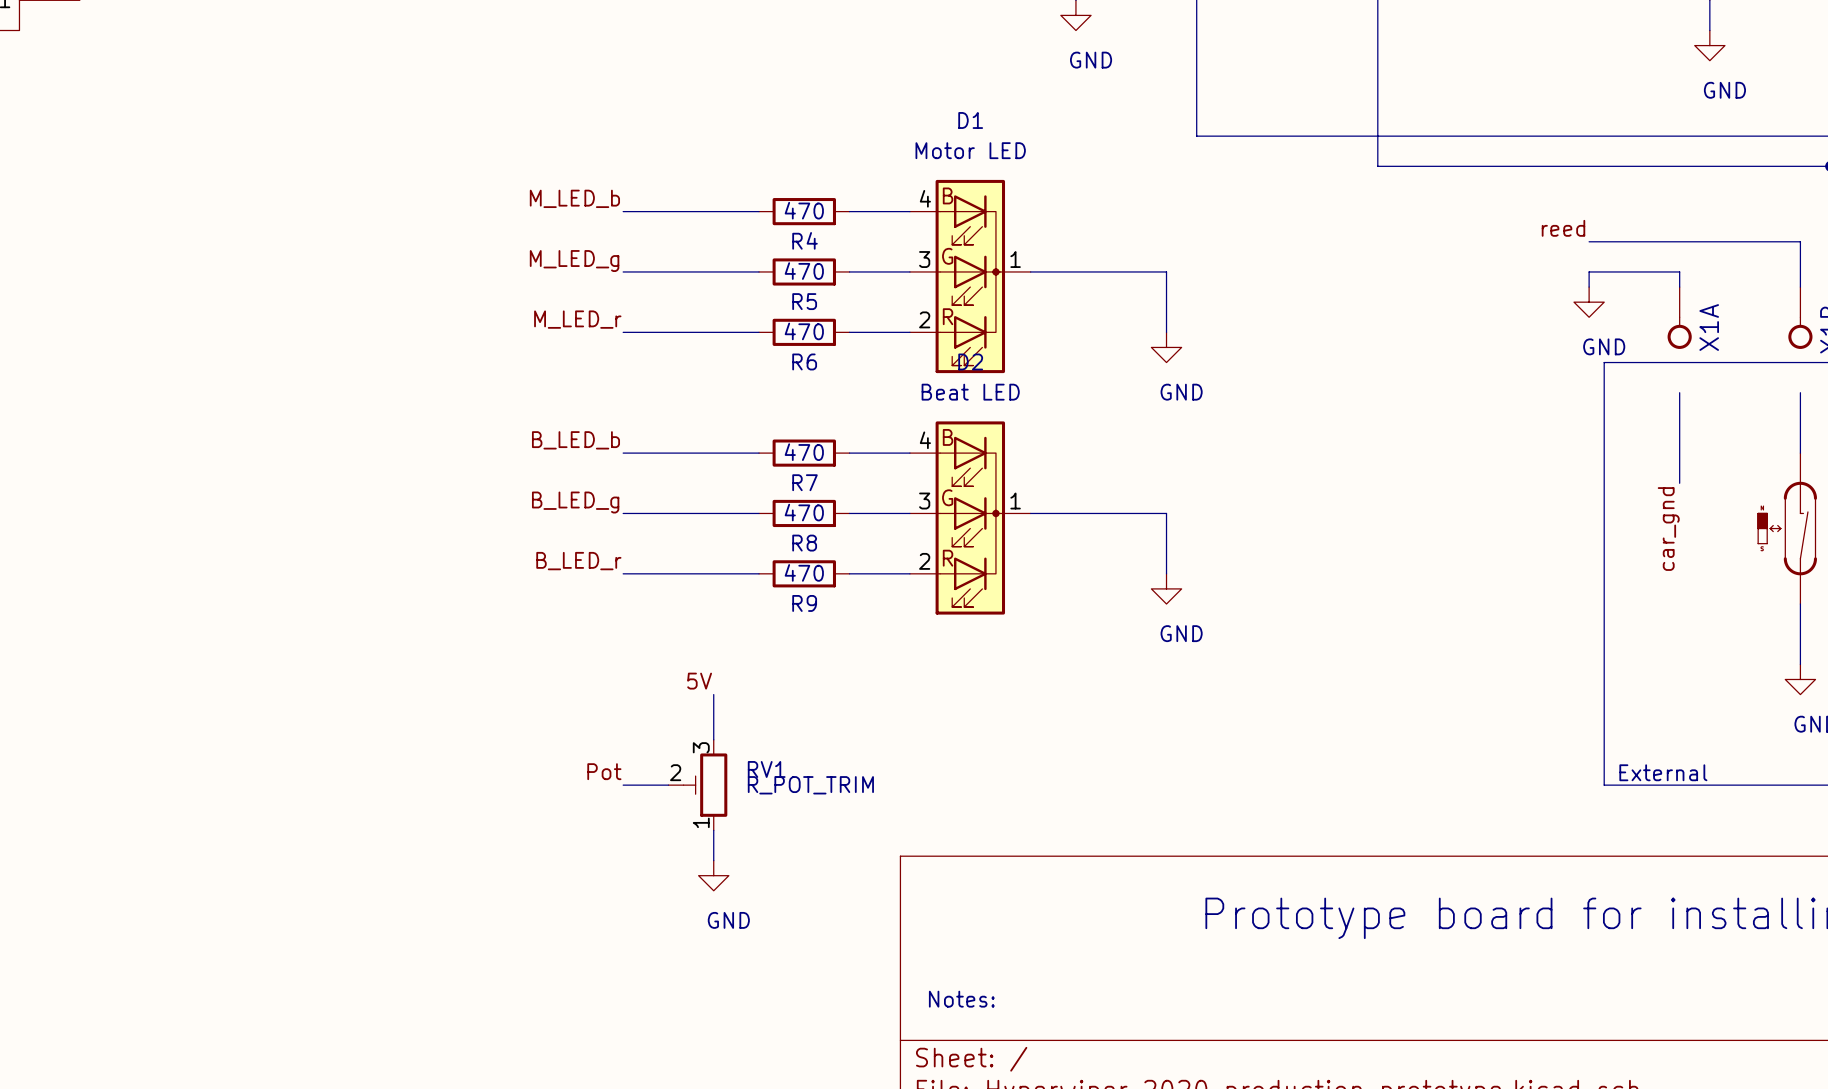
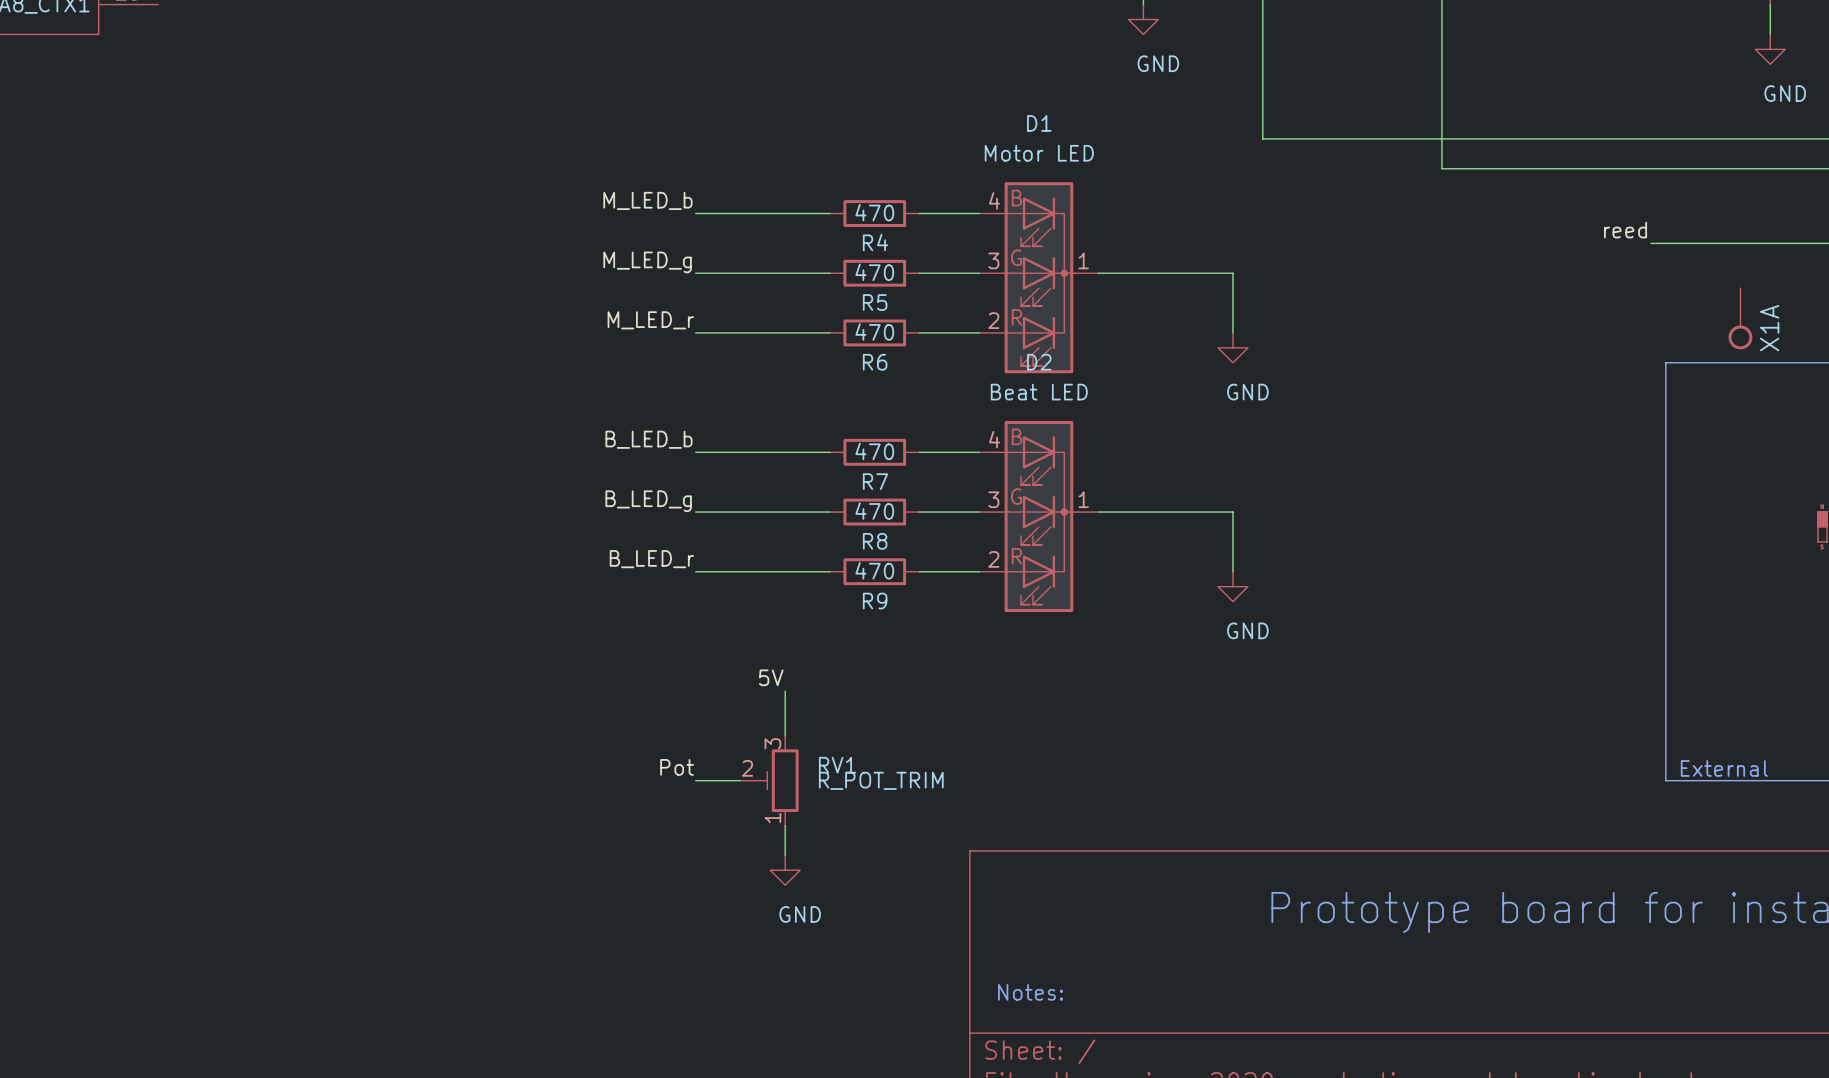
wire: (1589, 287) (1589, 271) (1679, 271) (1679, 287) -> none
power symbol: GND (1589, 302) -> none
wire: (1679, 392) (1679, 483) -> none
label: car_gnd (1668, 529) -> none

